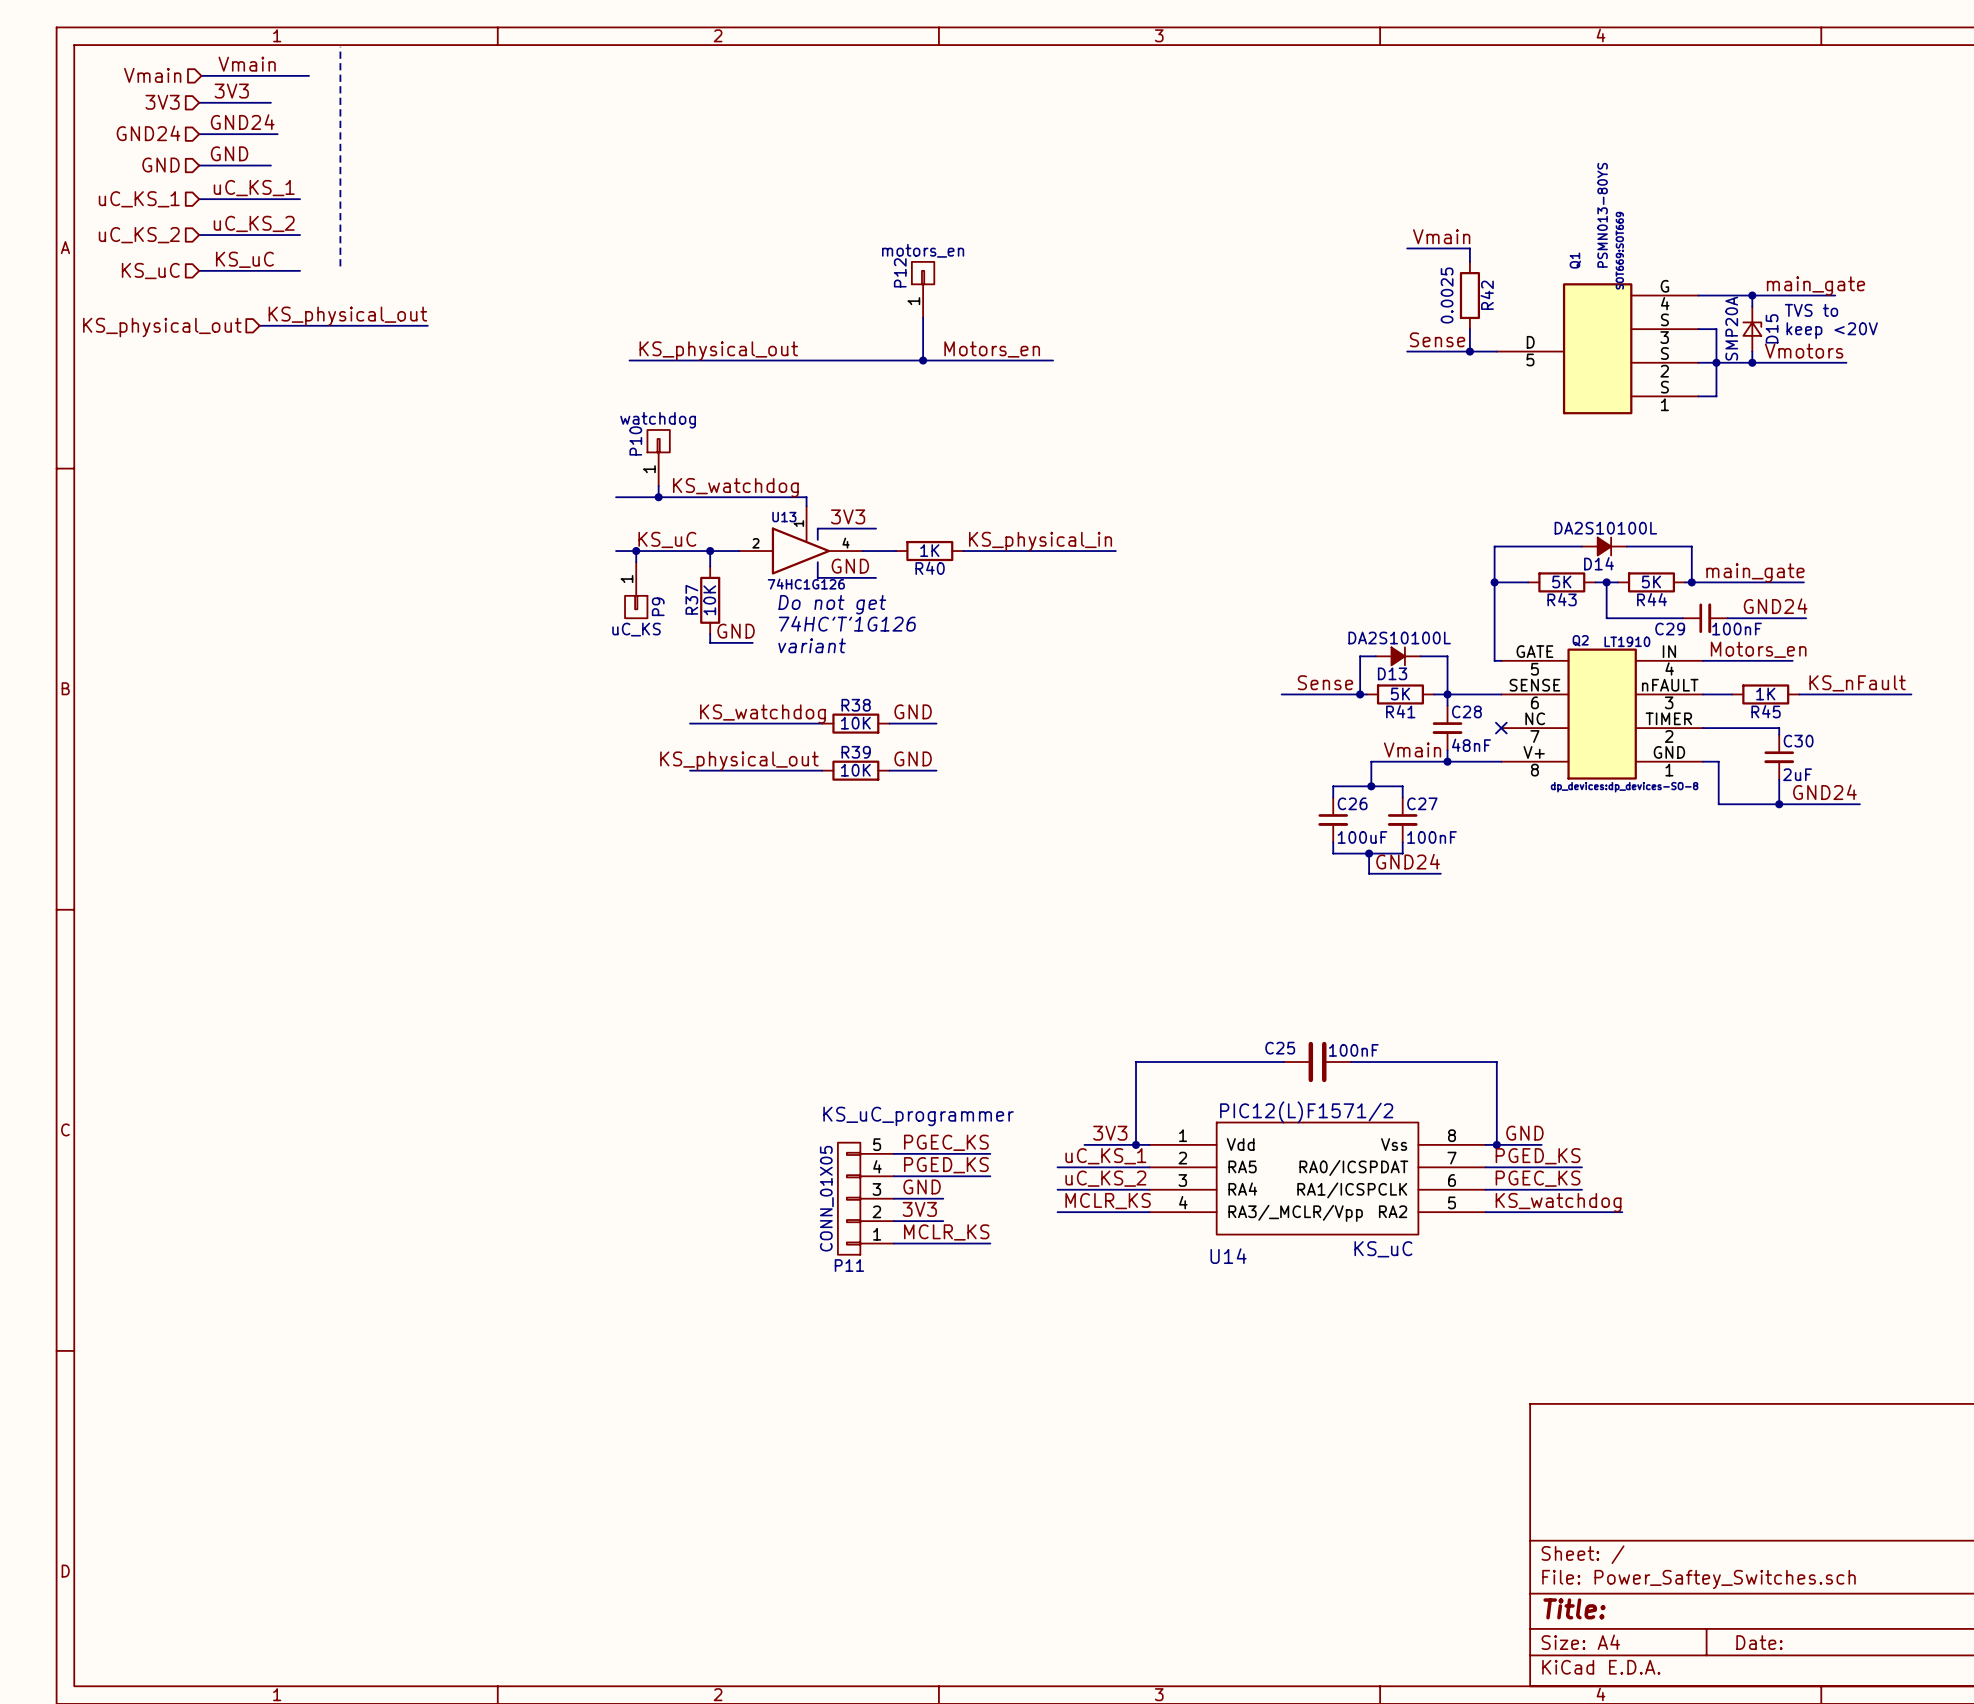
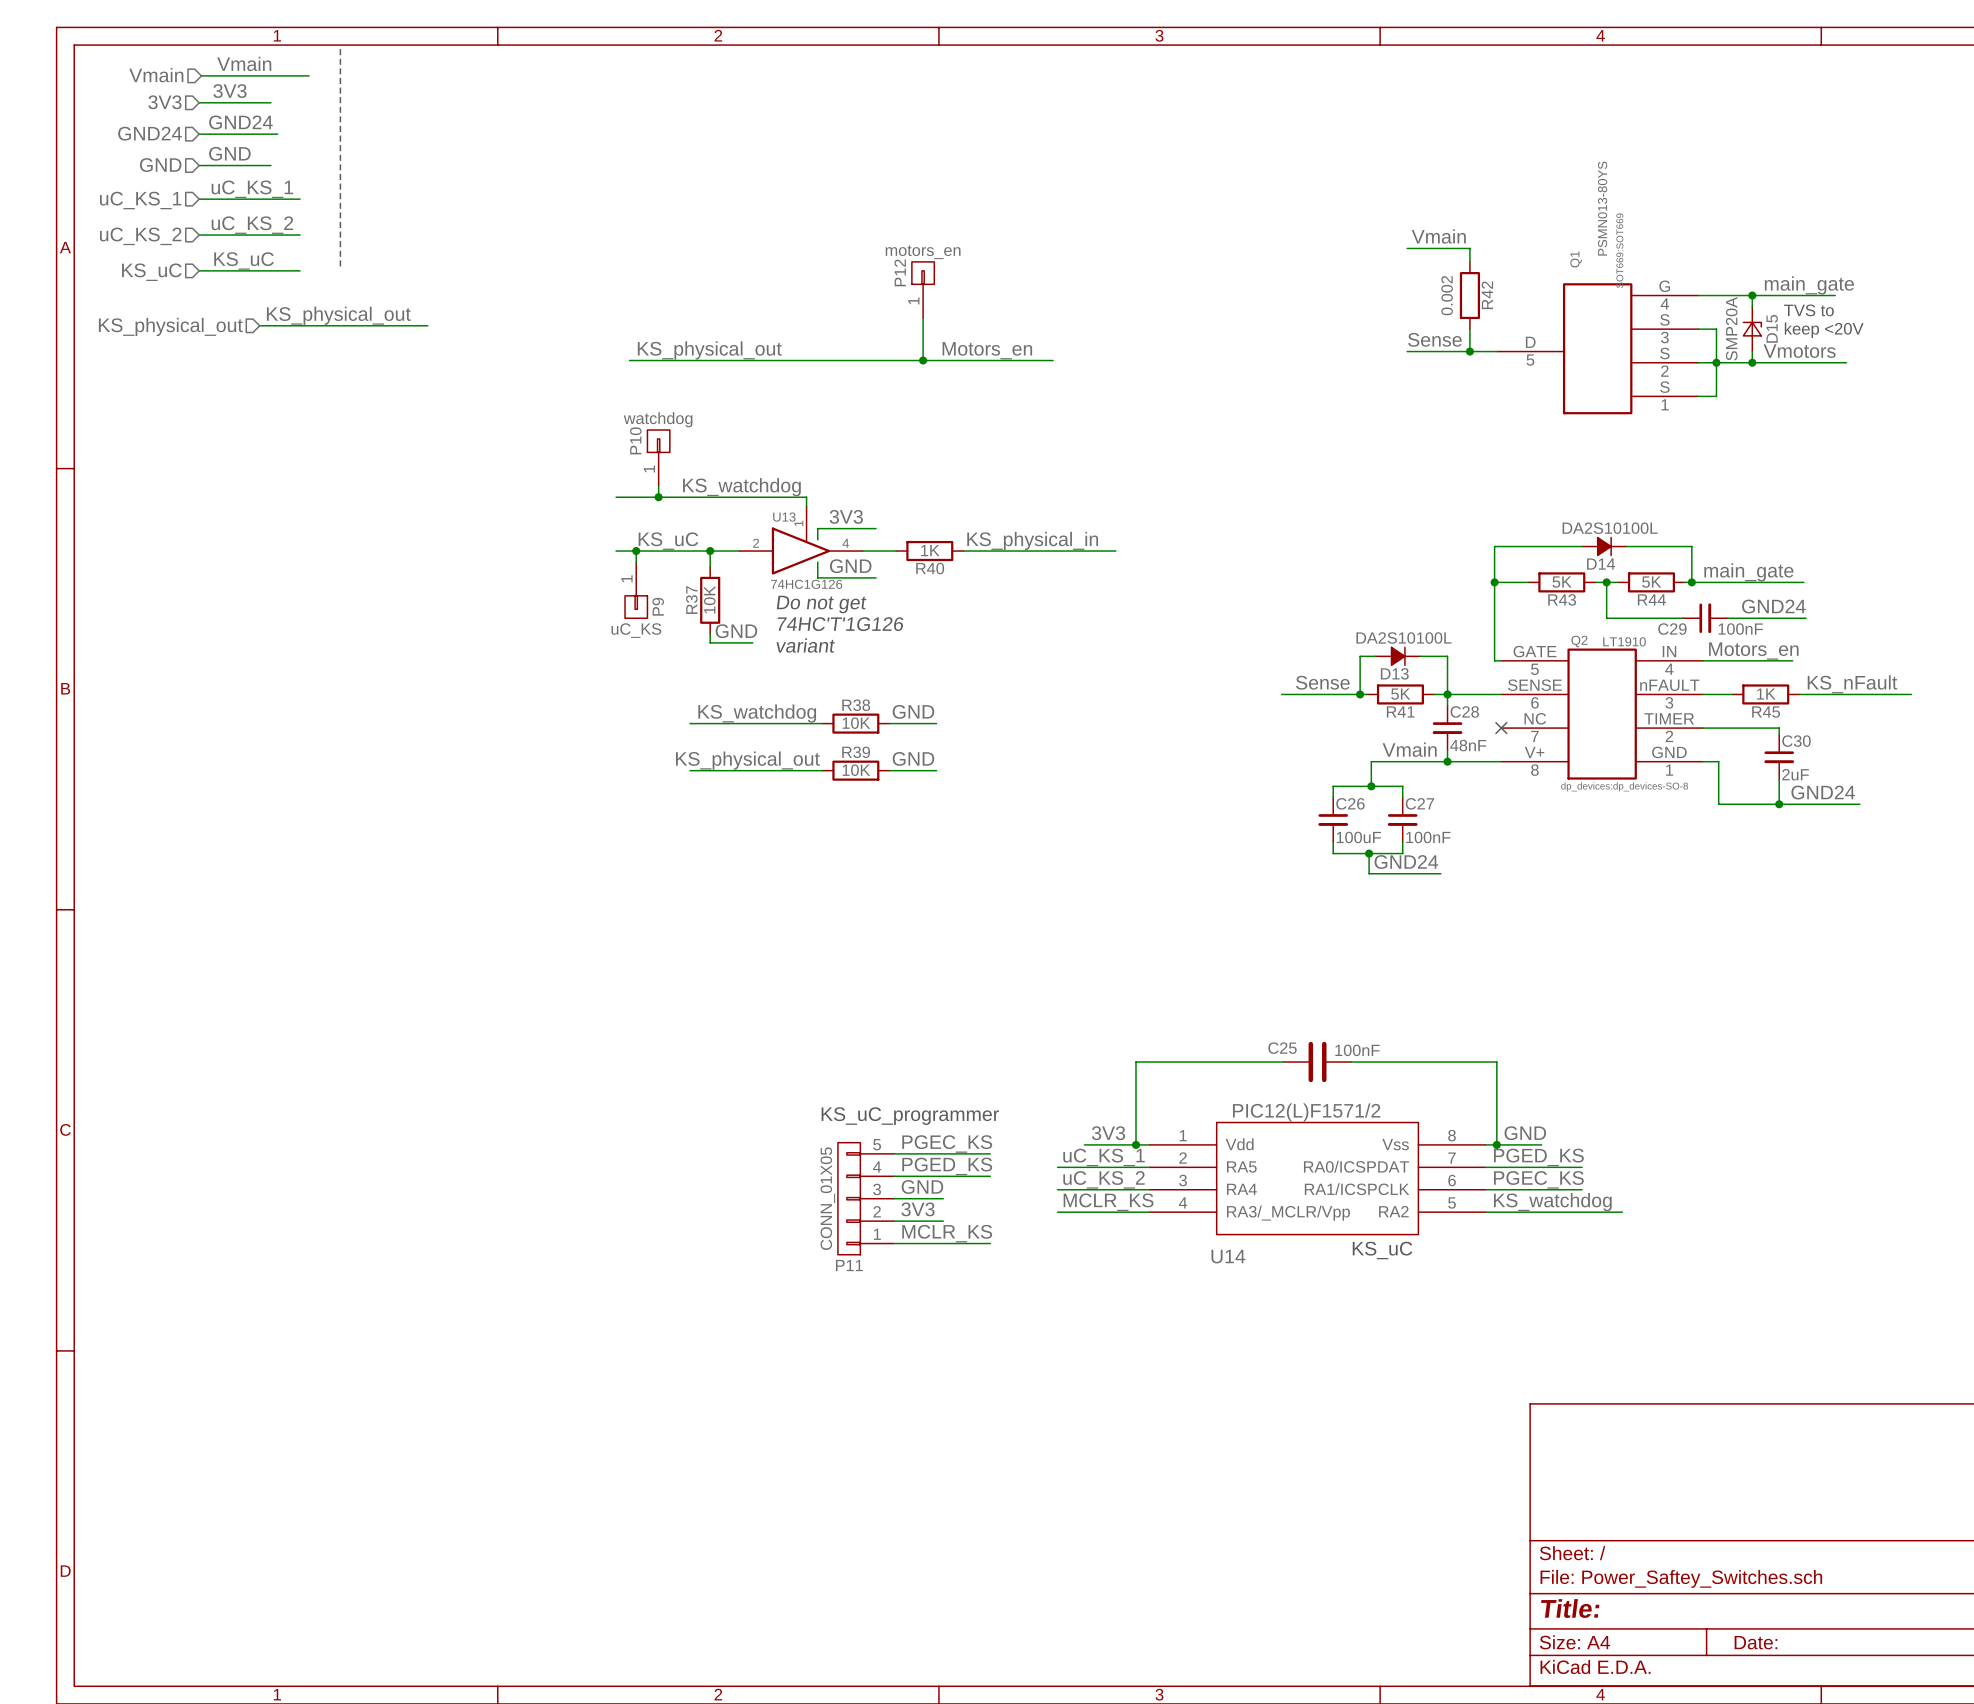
R42 value: 0.0025 (1447, 295) -> 0.002 (1447, 295)

